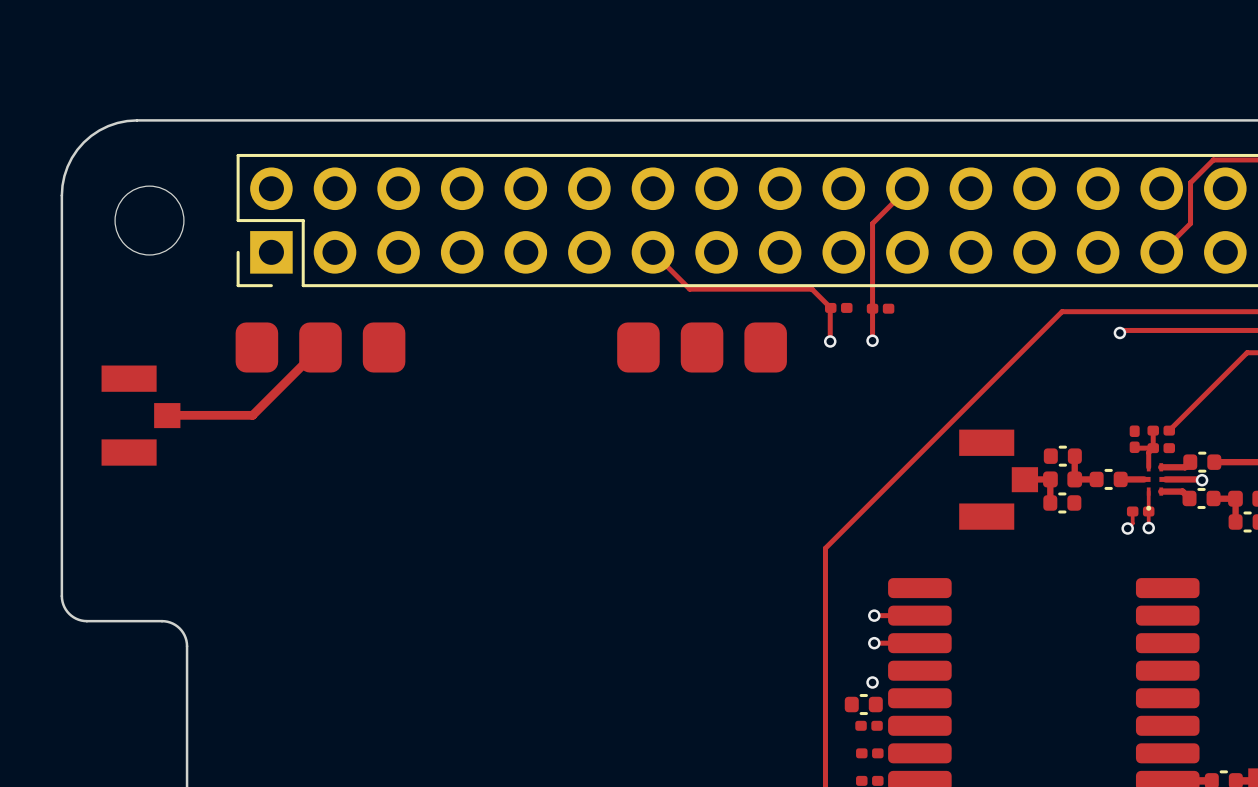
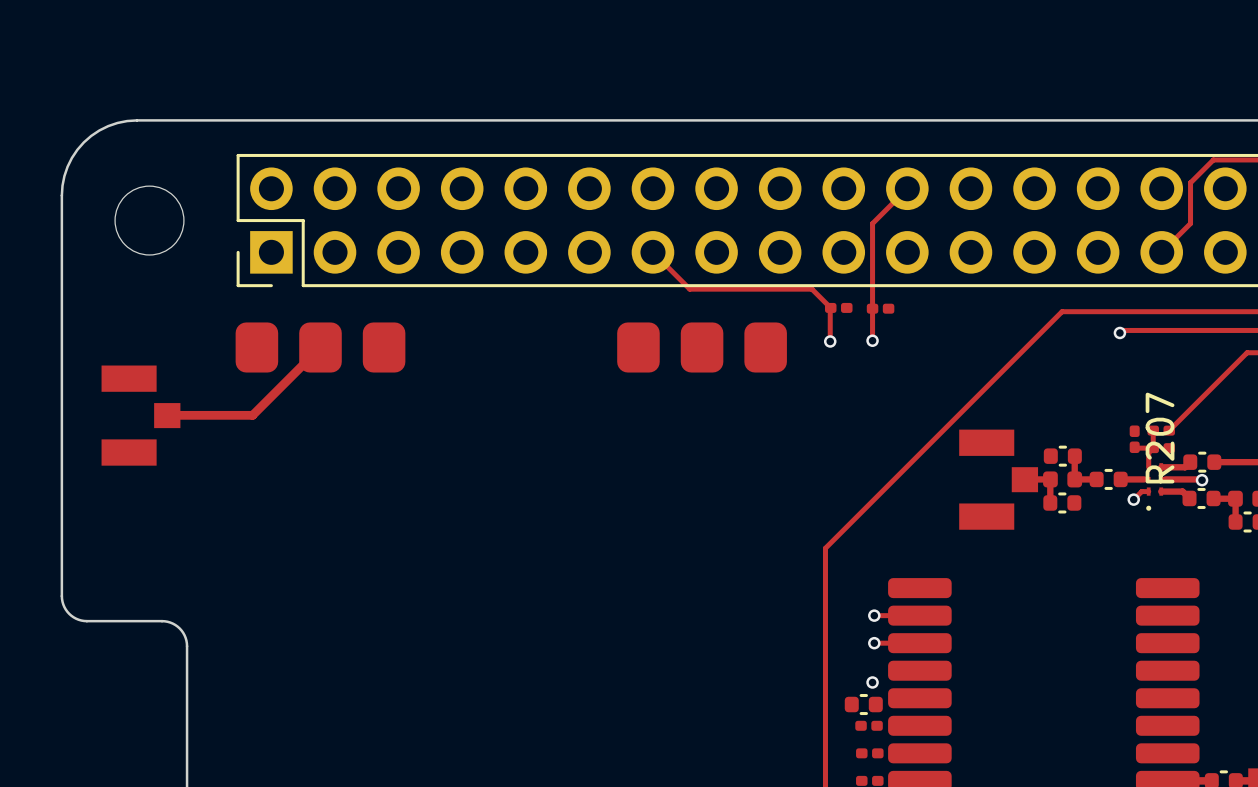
R207 name: none -> R207 (1160, 438)
track: (1148, 491) (1148, 528) -> (1148, 491) (1141, 491) (1133, 499)
via: none -> (1133, 499)
track: (1132, 511) (1132, 523) (1127, 528) -> none
part: (1140, 511) -> none
via: (1127, 528) -> none
via: (1148, 528) -> none

